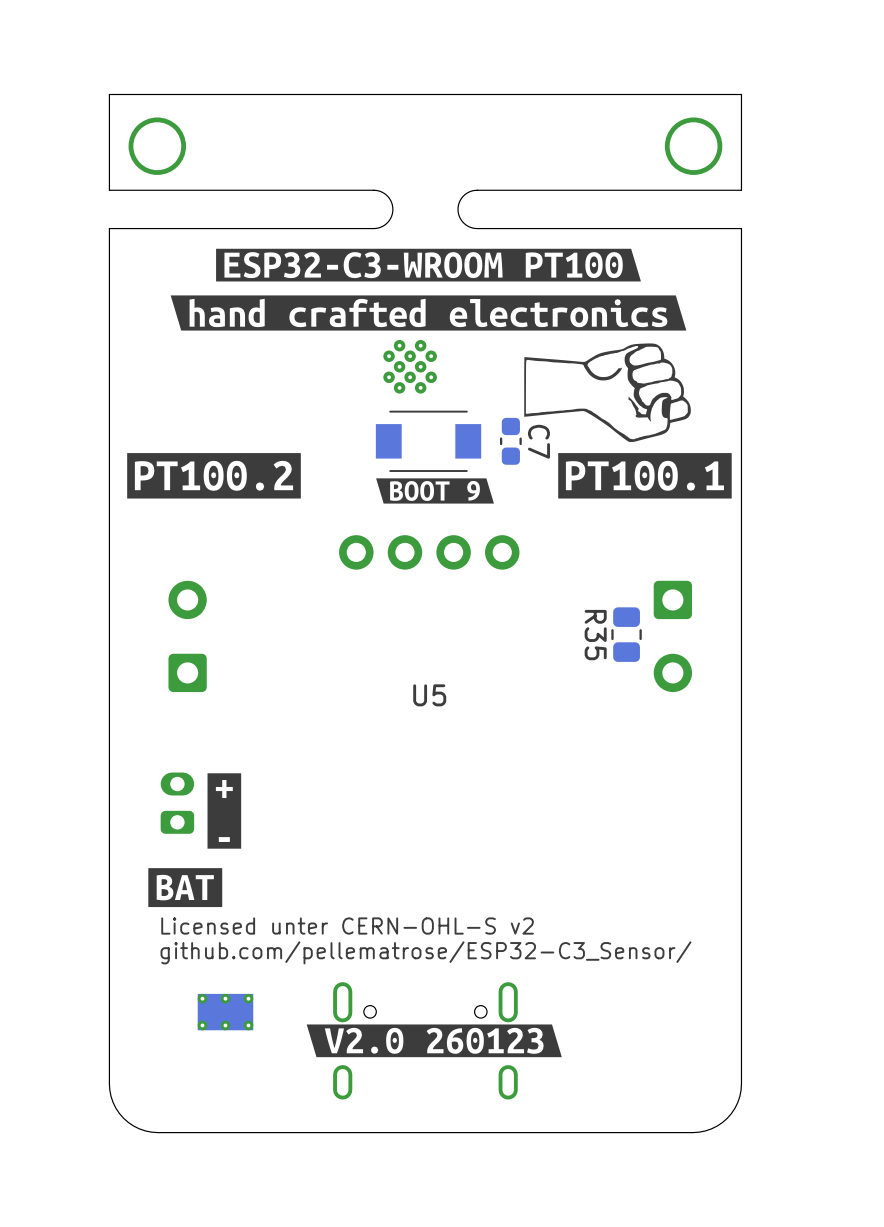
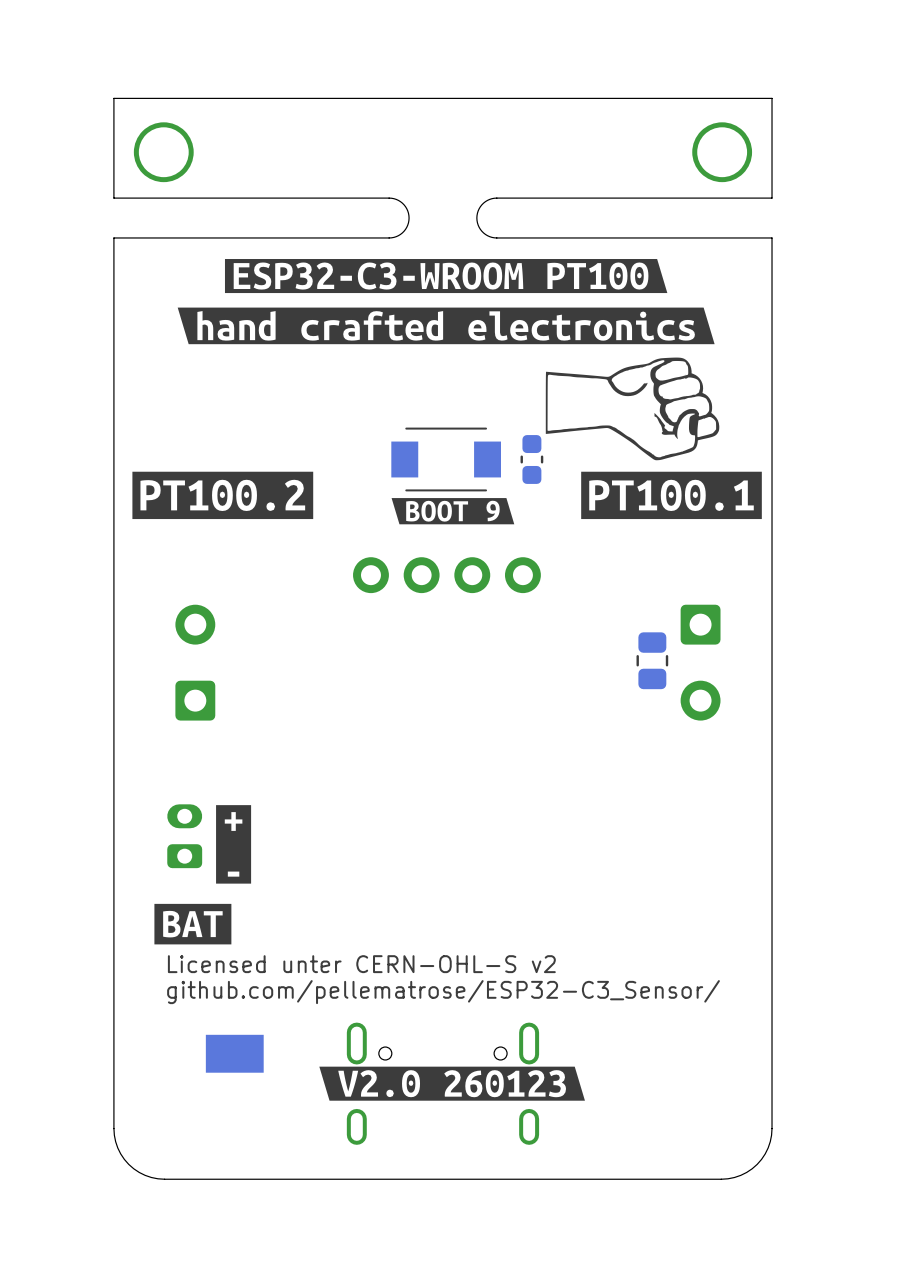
part: (410, 366) -> none
C7 name: C7 (538, 441) -> none
R35 name: R35 (595, 635) -> none
U5 name: U5 (429, 695) -> none
part footprint: [197, 993, 254, 1031] -> [205, 1034, 264, 1073]

